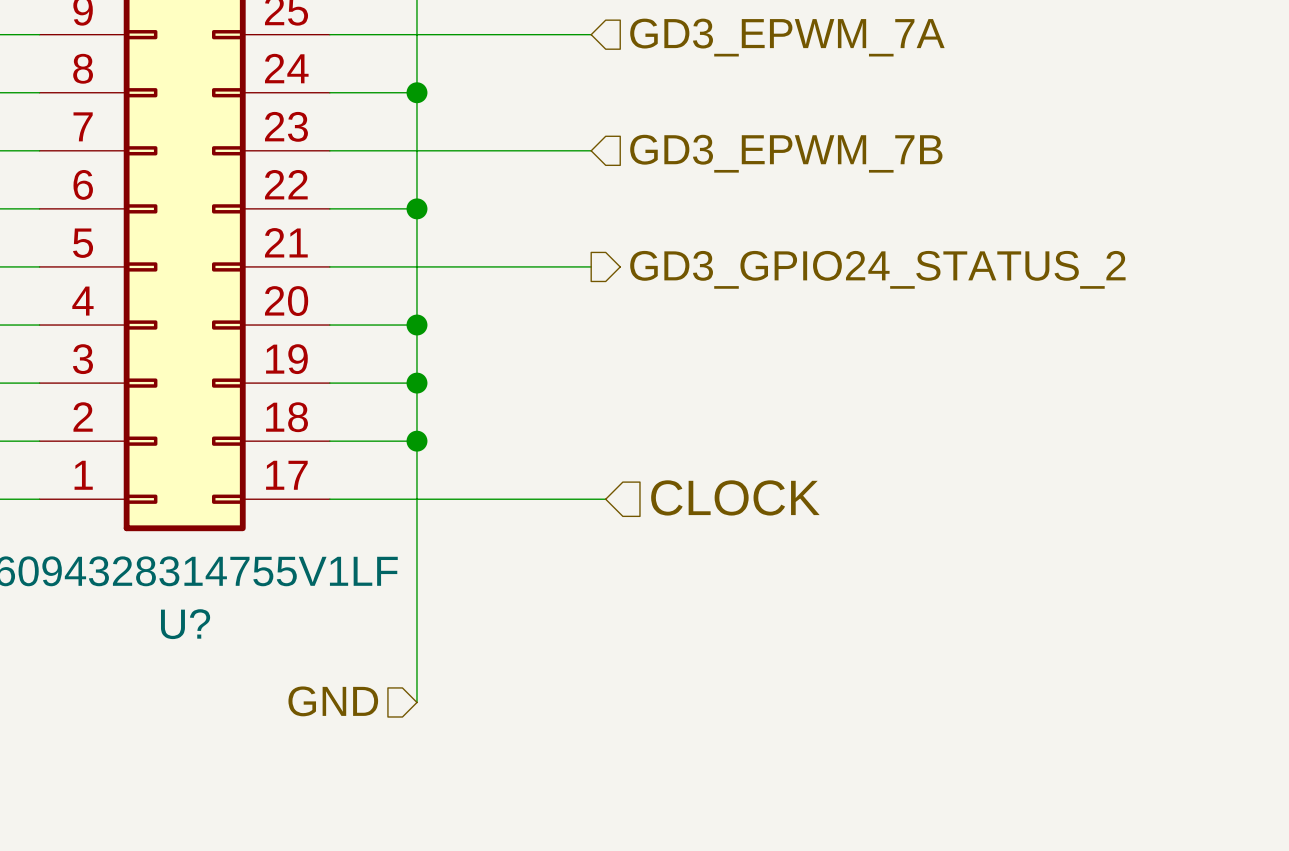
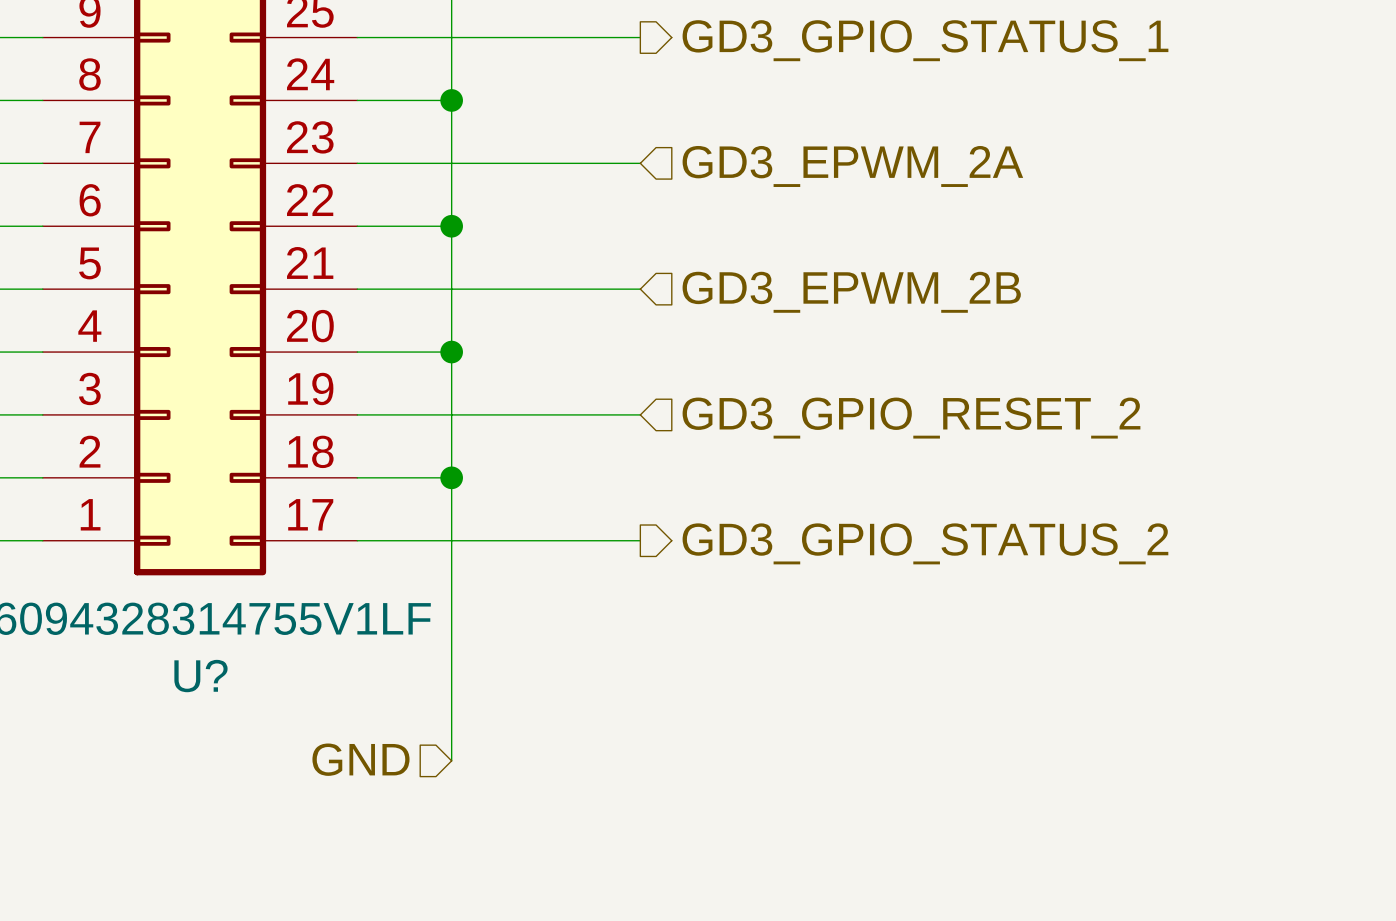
hierarchical label shape: input (787, 37) -> output (925, 40)
hierarchical label: GD3_EPWM_7A (787, 37) -> GD3_GPIO_STATUS_1 (925, 40)
hierarchical label: GD3_EPWM_7B (786, 153) -> GD3_EPWM_2A (852, 166)
hierarchical label shape: output (877, 269) -> input (851, 292)
hierarchical label: GD3_GPIO24_STATUS_2 (877, 269) -> GD3_EPWM_2B (851, 292)
wire: none -> (451, 414) (640, 414)
junction: (416, 383) -> none
hierarchical label: none -> GD3_GPIO_RESET_2 (911, 418)
hierarchical label shape: input (735, 497) -> output (925, 543)
hierarchical label: CLOCK (735, 497) -> GD3_GPIO_STATUS_2 (925, 543)
wire: (591, 499) (605, 499) -> none

